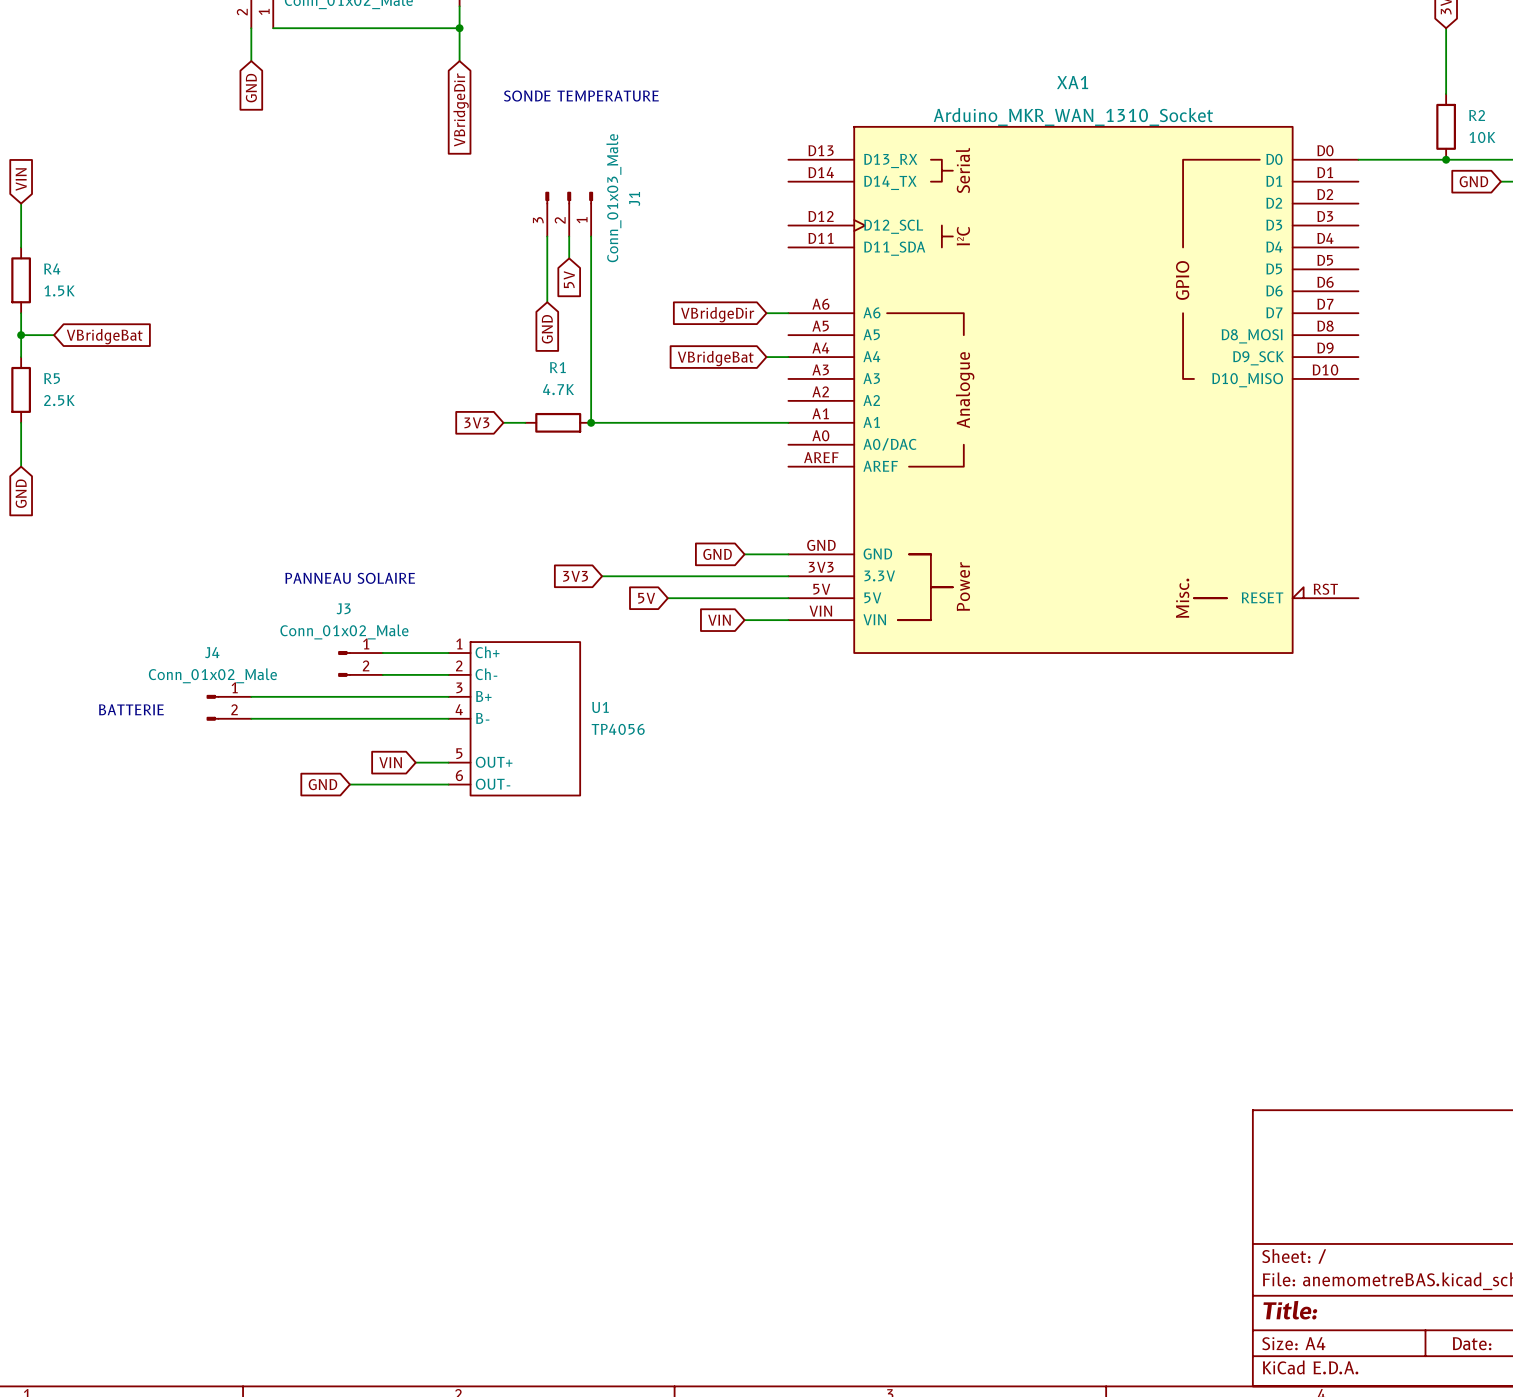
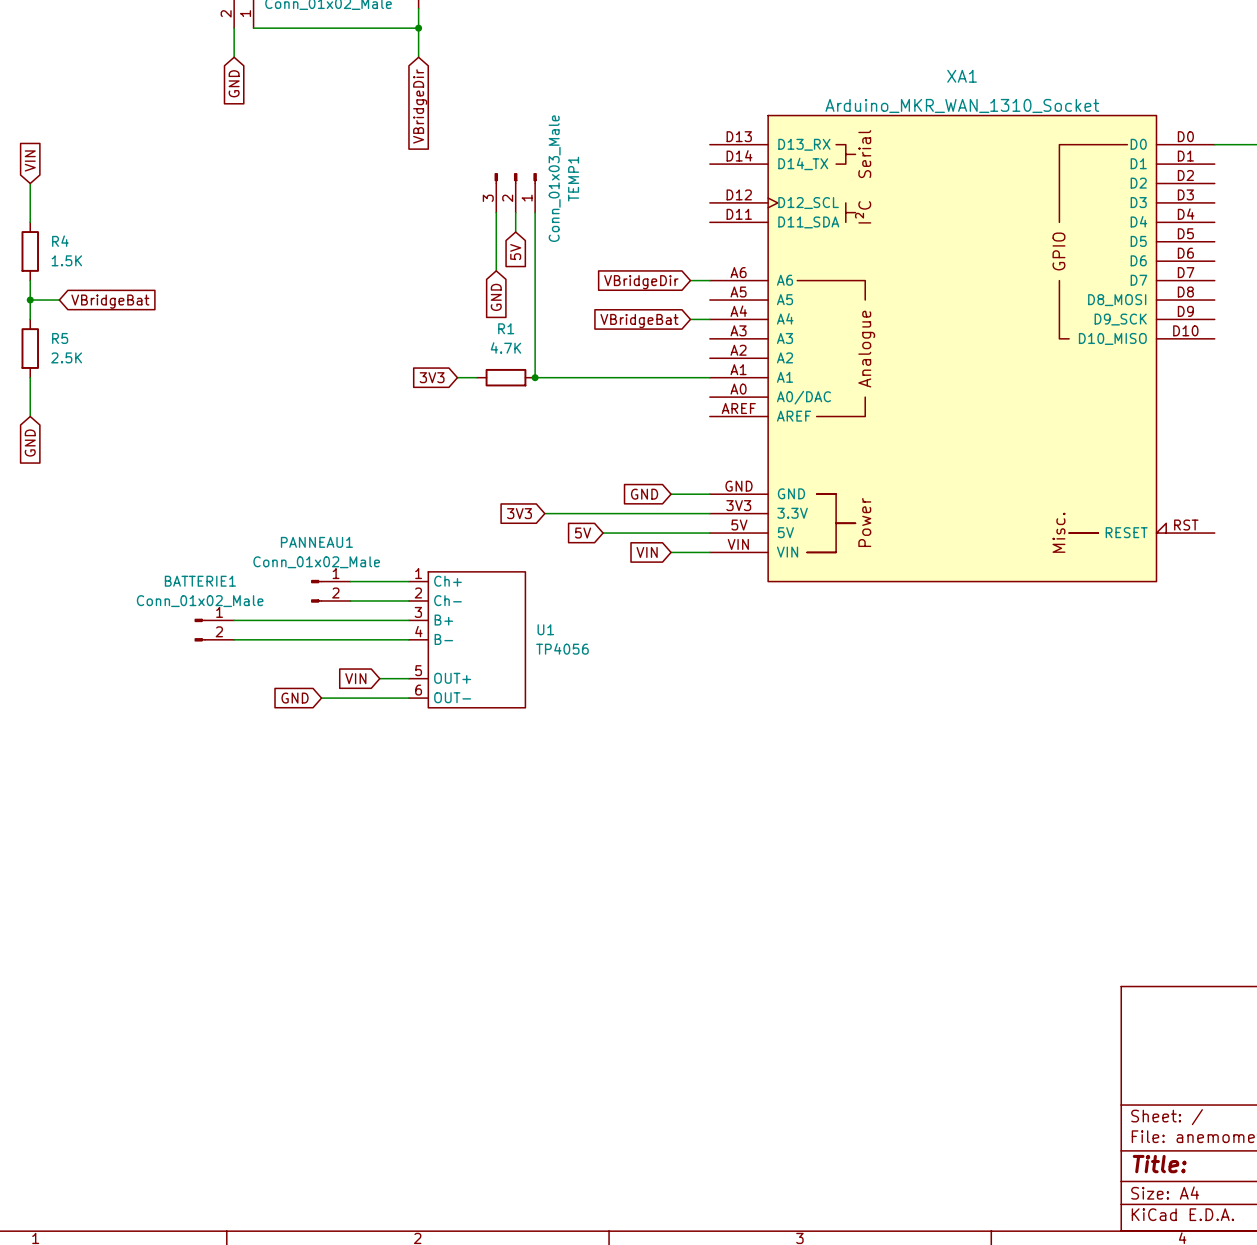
text: SONDE TEMPERATURE (581, 96) -> none
J1 name: J1 (634, 199) -> TEMP1 (573, 179)
text: PANNEAU SOLAIRE (350, 578) -> none
J3 name: J3 (343, 608) -> PANNEAU1 (316, 542)
J4 name: J4 (212, 652) -> BATTERIE1 (200, 581)
text: BATTERIE (131, 709) -> none

